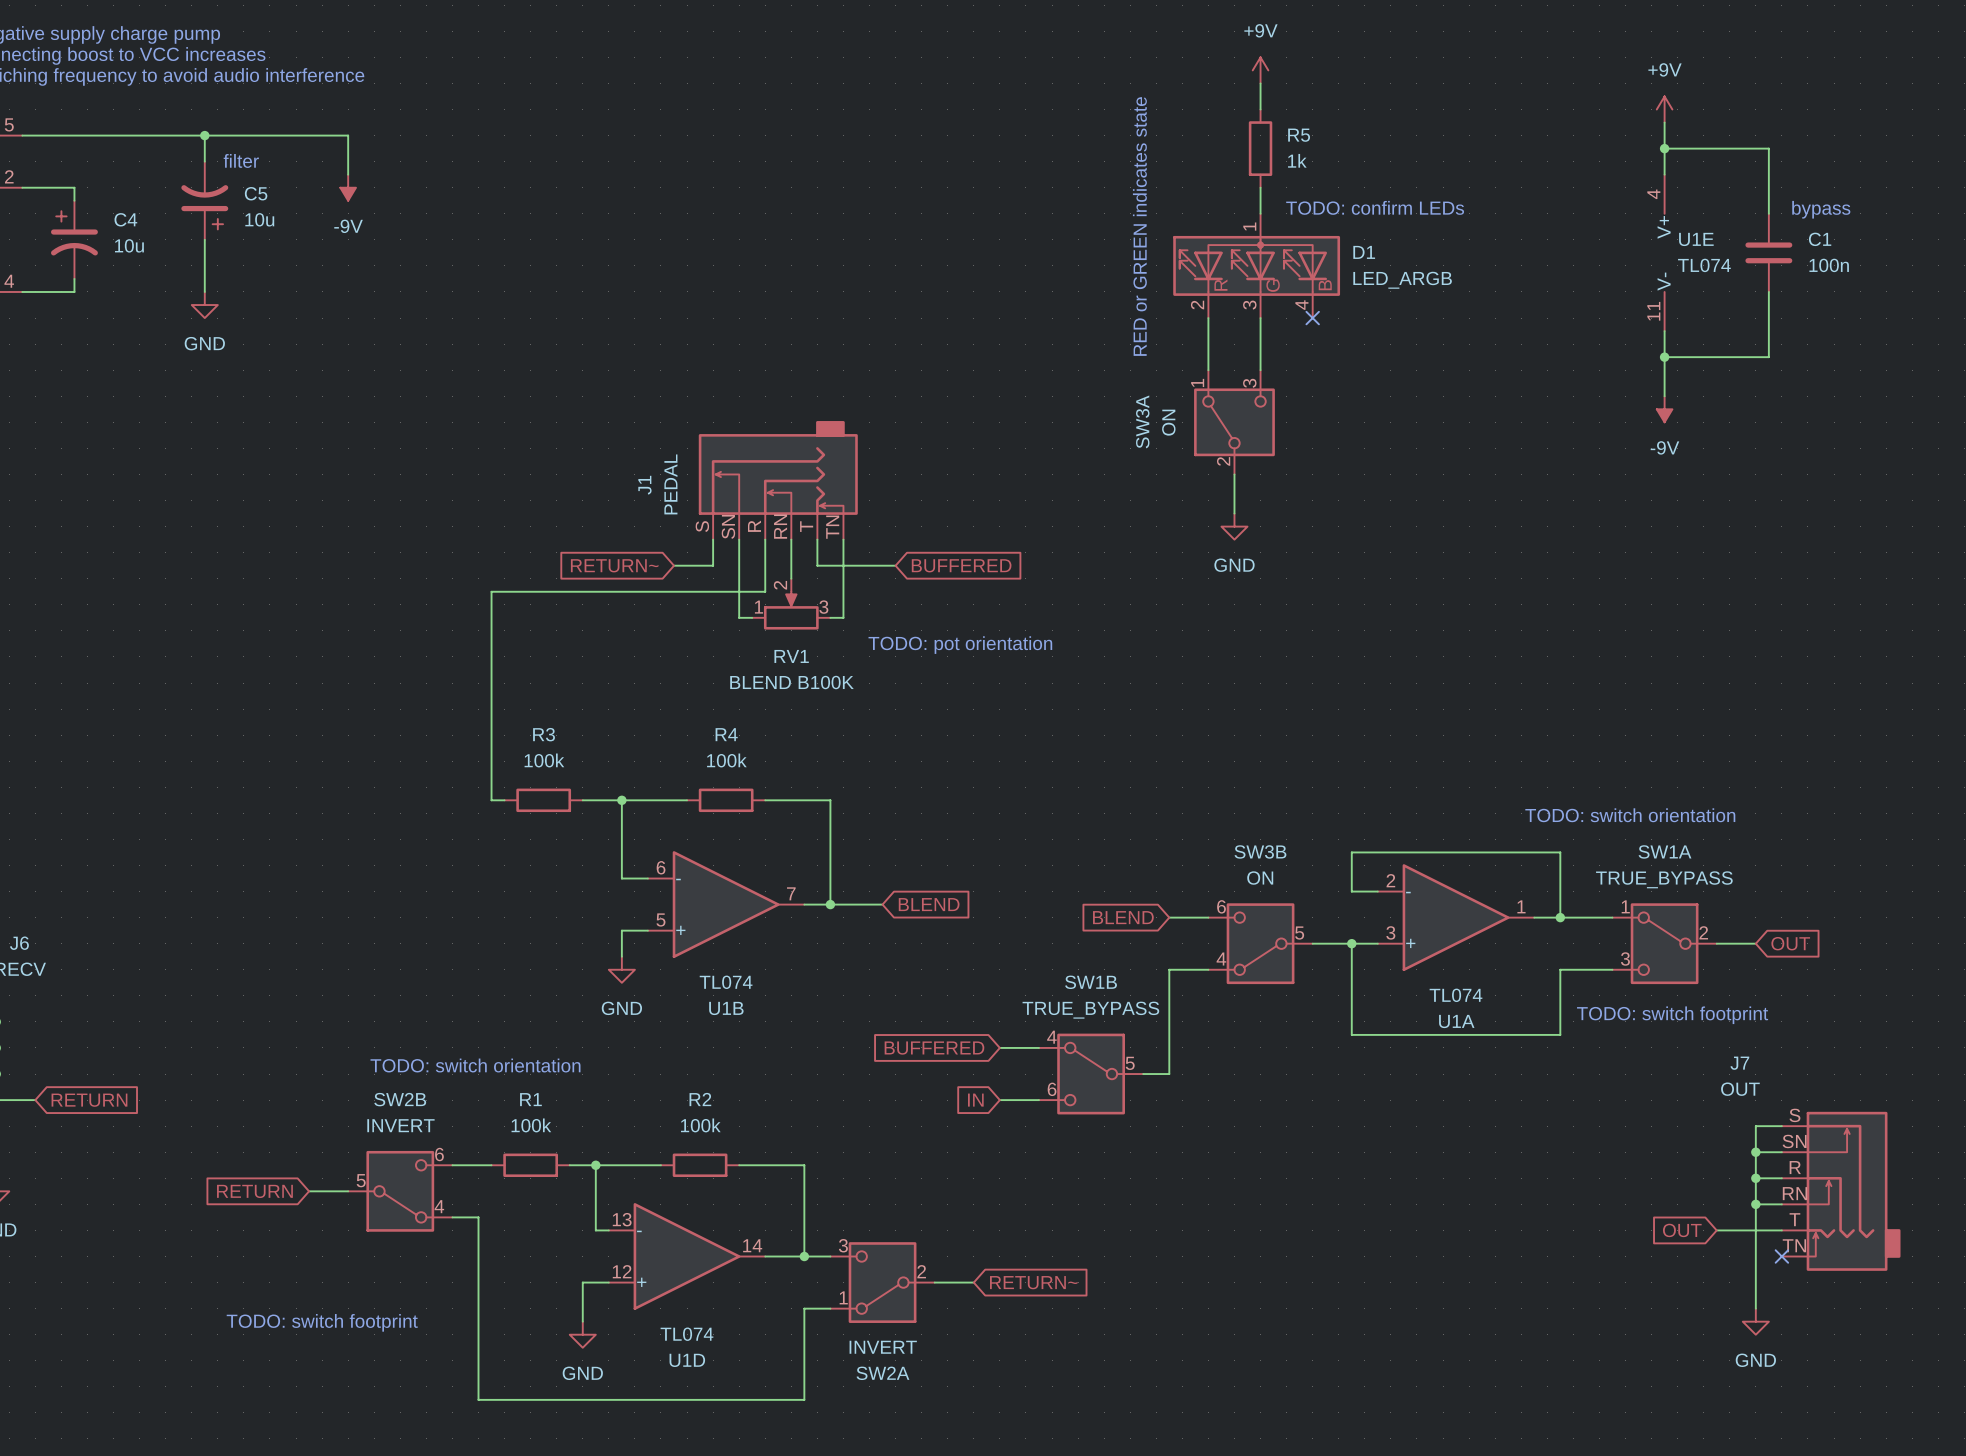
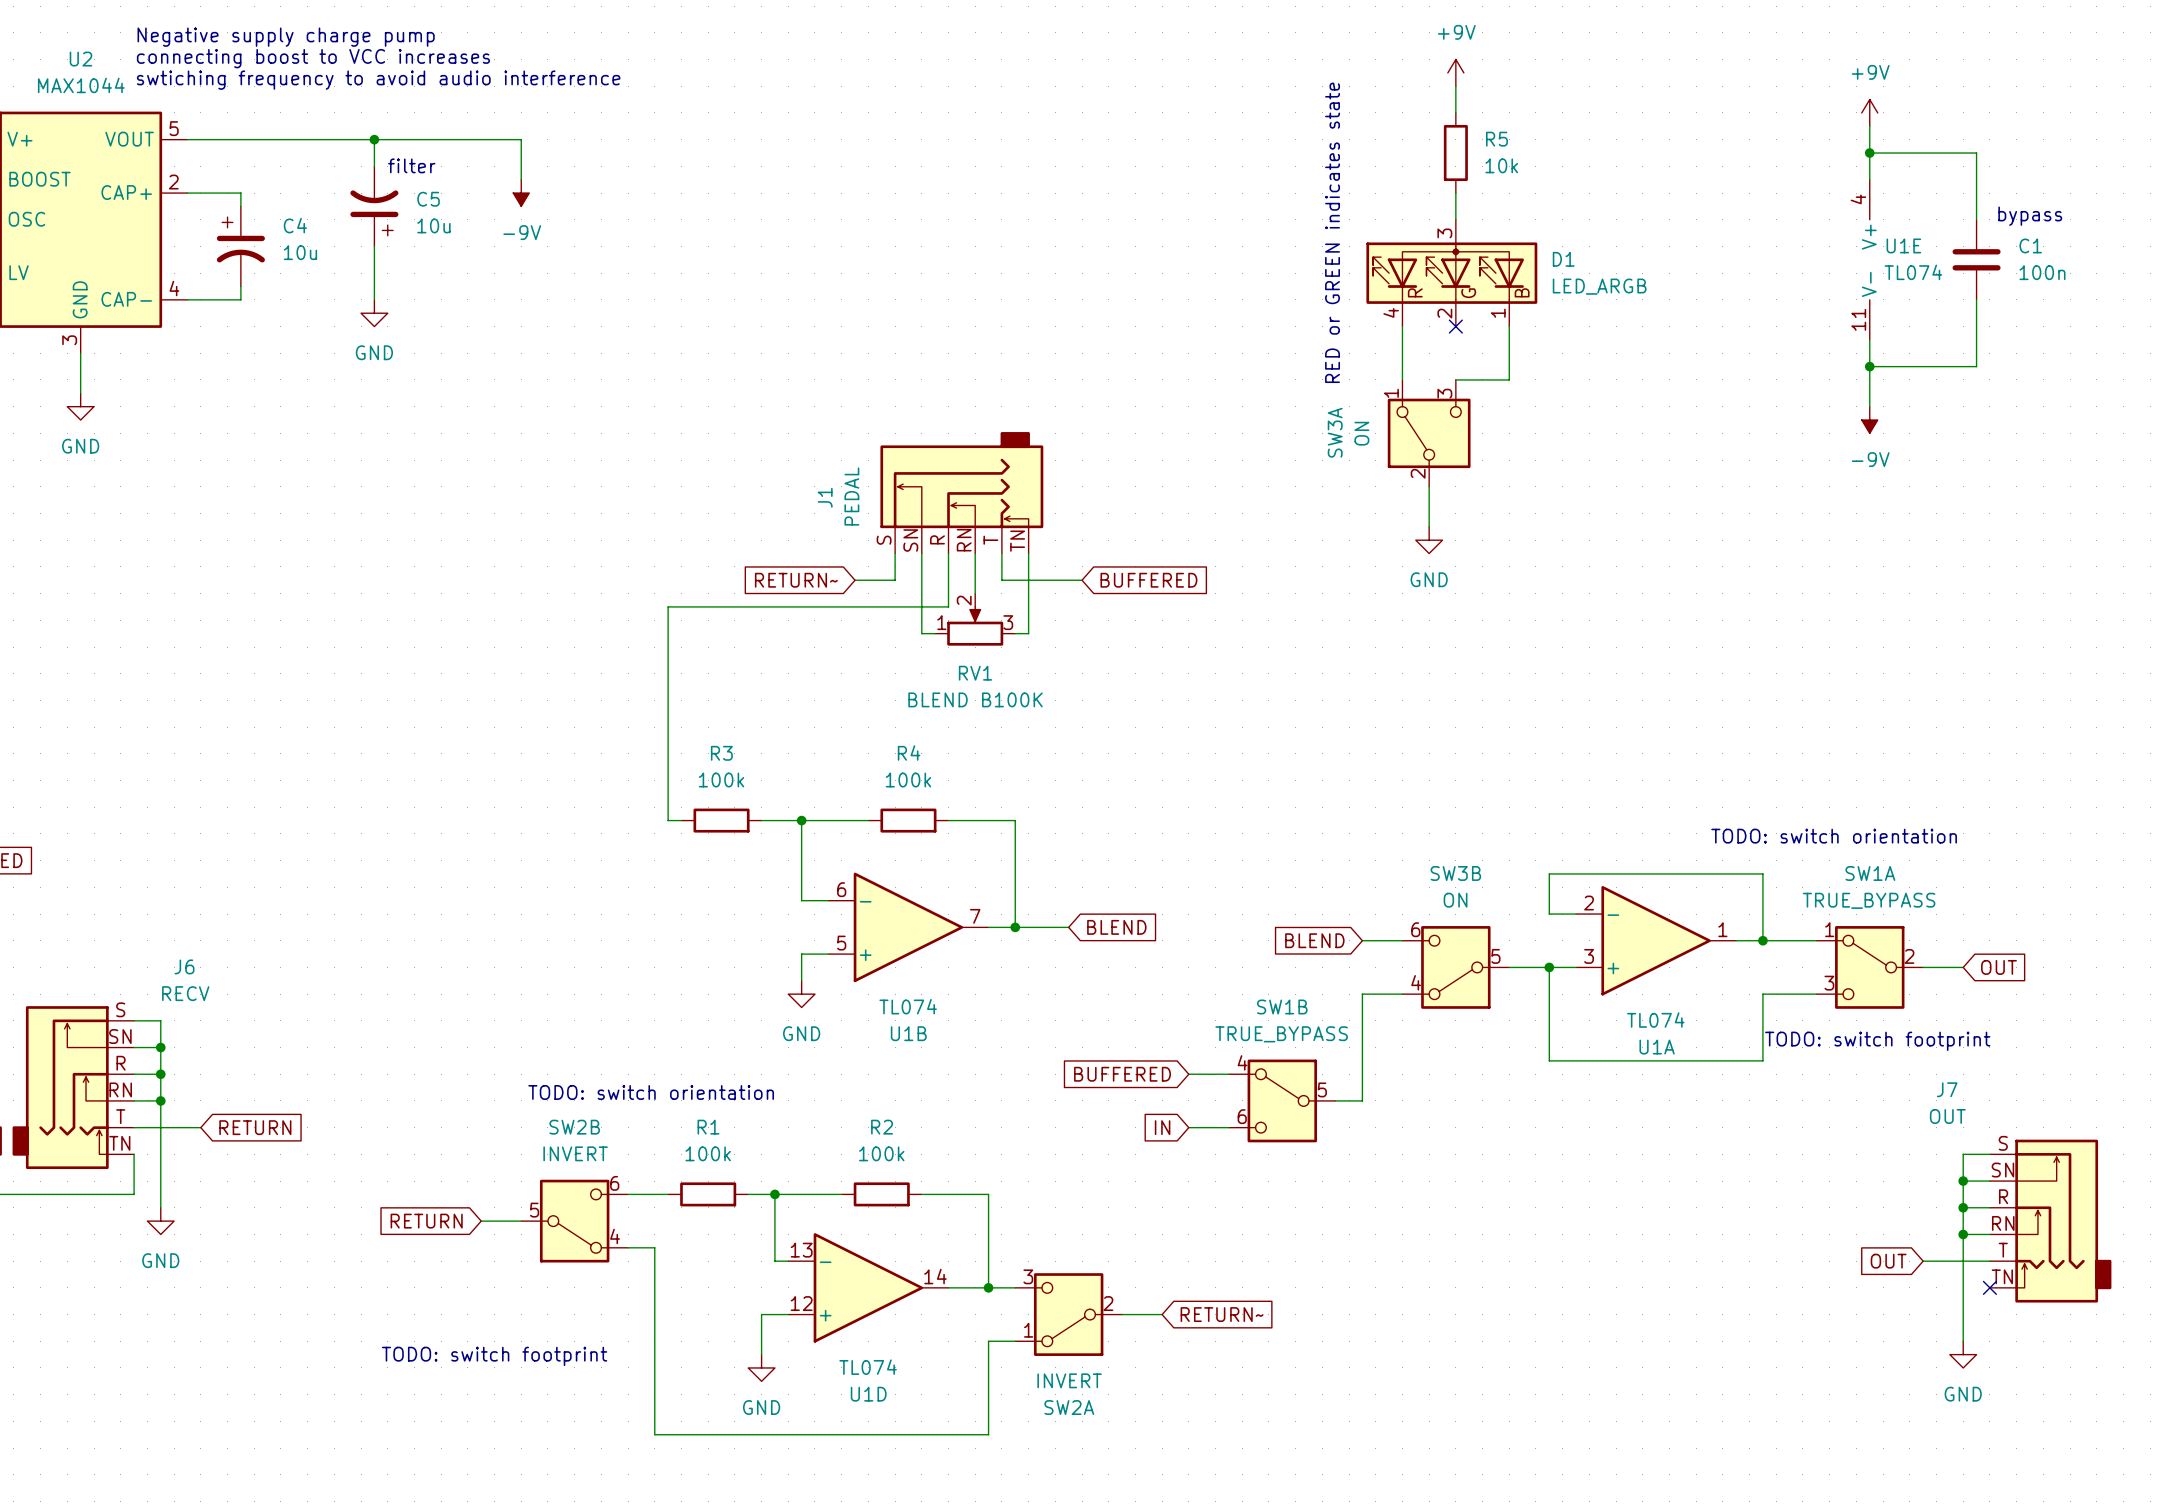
R5 value: 1k (1297, 160) -> 10k (1501, 165)
text: TODO: confirm LEDs (1375, 207) -> none
D1 pin number: 1 (1249, 226) -> 3 (1444, 233)
D1 pin number: 2 (1197, 305) -> 4 (1391, 312)
D1 pin number: 3 (1249, 305) -> 2 (1444, 313)
D1 pin number: 4 (1301, 305) -> 1 (1498, 313)
wire: (1260, 318) (1260, 370) -> (1509, 326) (1509, 379) (1455, 379)
no-connect mark position: (1312, 318) -> (1455, 326)
text: TODO: pot orientation (960, 645) -> none

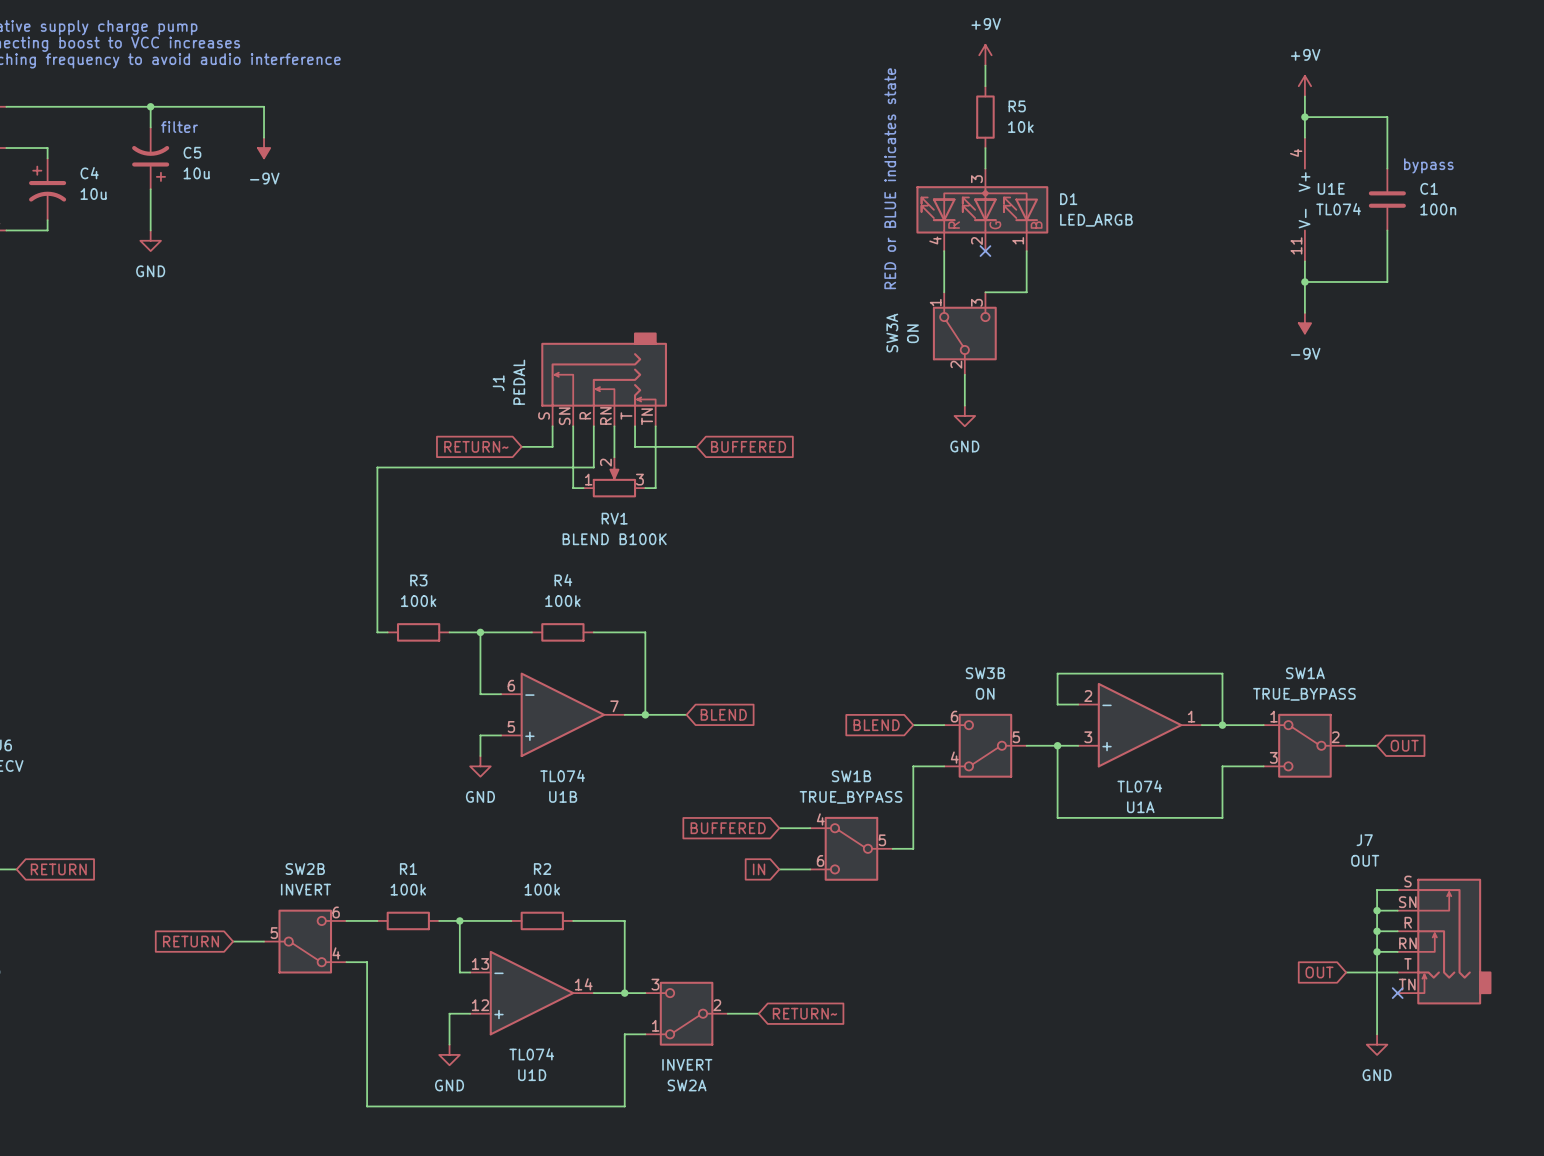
text: RED or GREEN indicates state (1332, 232) -> RED or BLUE indicates state (890, 178)
text: TODO: switch orientation (1834, 836) -> none
text: TODO: switch footprint (1877, 1041) -> none
text: TODO: switch orientation (651, 1092) -> none
text: TODO: switch footprint (494, 1356) -> none

